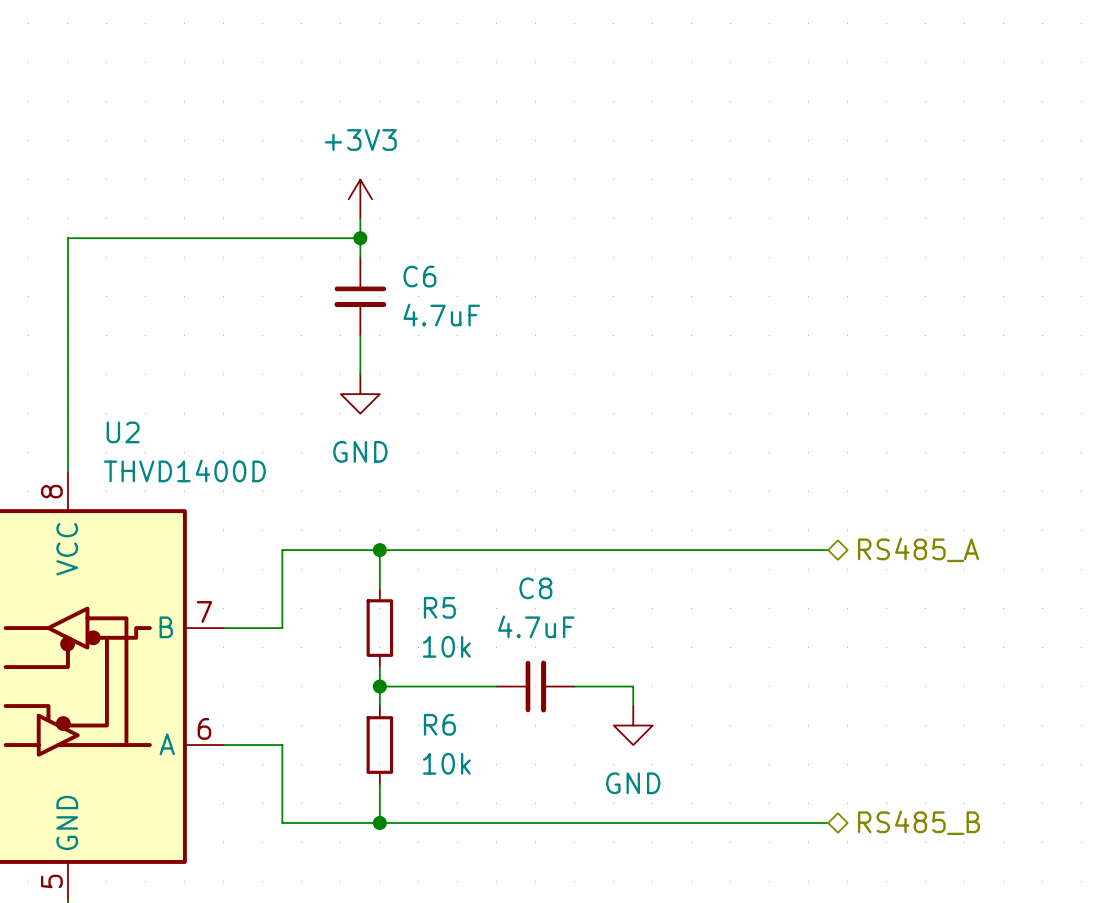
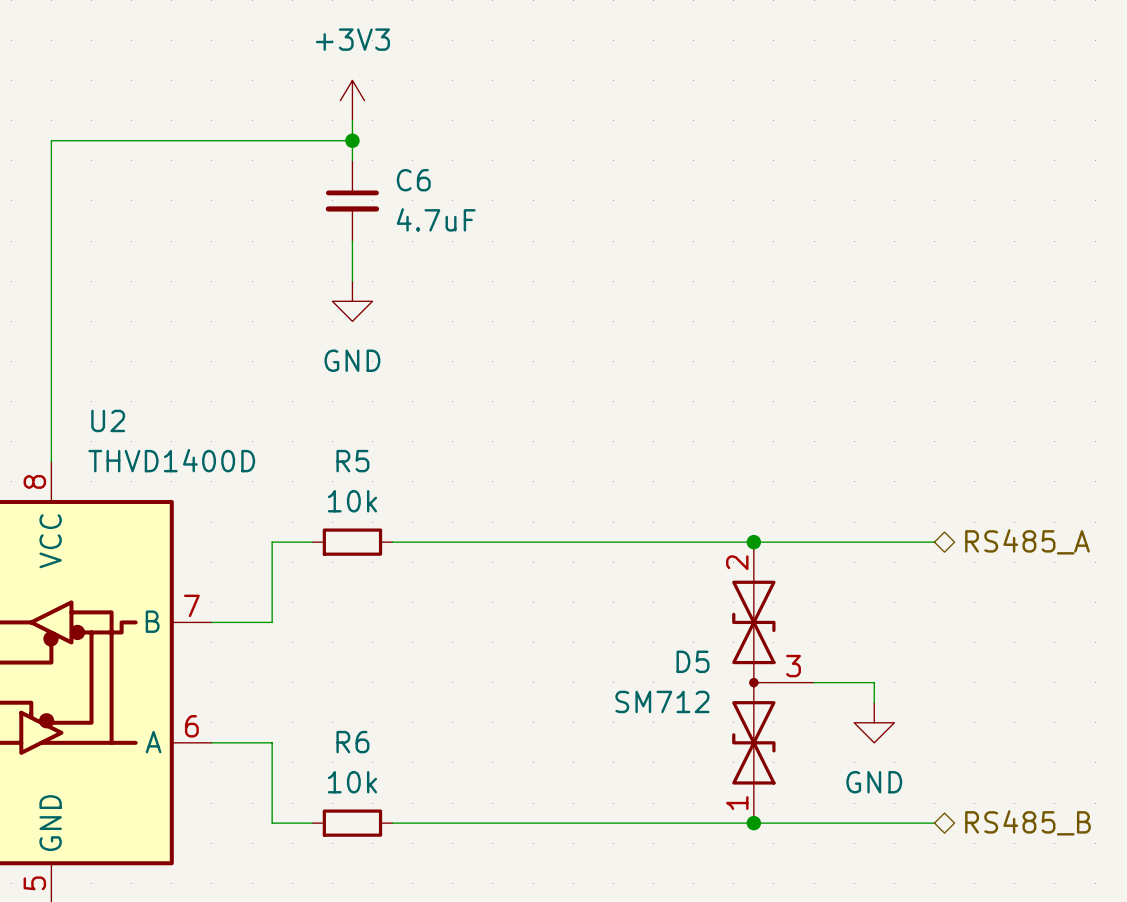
power symbol position: +3V3 (360, 199) -> +3V3 (352, 100)
wire: (67, 238) (360, 238) -> (51, 221) (51, 140) (352, 140)
junction position: (360, 238) -> (352, 140)
C6 position: (360, 296) -> (352, 200)
wire: (360, 335) (360, 374) -> (352, 120) (352, 160)
power symbol position: GND (360, 394) -> GND (352, 301)
hierarchical label position: RS485_A (918, 549) -> RS485_A (1027, 541)
wire: (321, 550) (399, 550) -> none
wire: (379, 550) (379, 589) -> none
junction: (379, 550) -> none
junction: none -> (753, 542)
wire: none -> (834, 542) (934, 542)
R5 name position: R5 (439, 607) -> R5 (352, 461)
R5 rotation: 0° (379, 628) -> 90° clockwise (352, 542)
R5 position: (379, 628) -> (352, 542)
R5 value position: 10k (446, 646) -> 10k (352, 501)
wire: (379, 667) (379, 706) -> none
wire: (379, 686) (496, 686) -> none
junction: (379, 686) -> none
C8: 4.7uF (535, 686) -> none
wire: (574, 686) (633, 686) (633, 706) -> (814, 682) (874, 682) (874, 702)
D5: none -> SM712 (773, 682)
R6 name position: R6 (439, 724) -> R6 (352, 742)
power symbol position: GND (633, 725) -> GND (874, 722)
R6 rotation: 0° (379, 745) -> 90° clockwise (352, 823)
R6 position: (379, 745) -> (352, 823)
R6 value position: 10k (446, 763) -> 10k (352, 782)
wire: (379, 784) (379, 822) -> none
wire: (321, 822) (399, 822) -> none
junction: (379, 822) -> none
junction: none -> (753, 823)
wire: none -> (834, 823) (934, 823)
hierarchical label position: RS485_B (918, 822) -> RS485_B (1027, 822)

